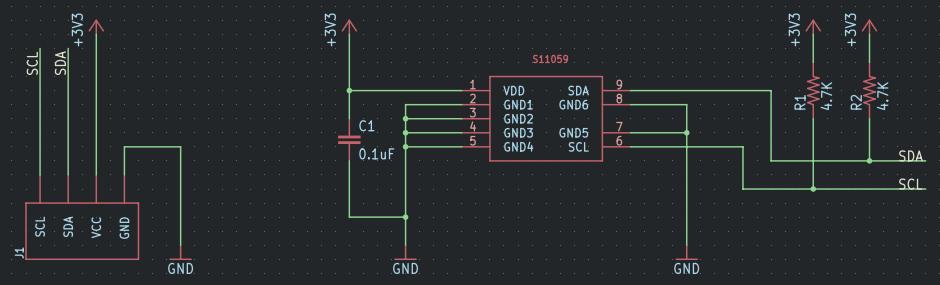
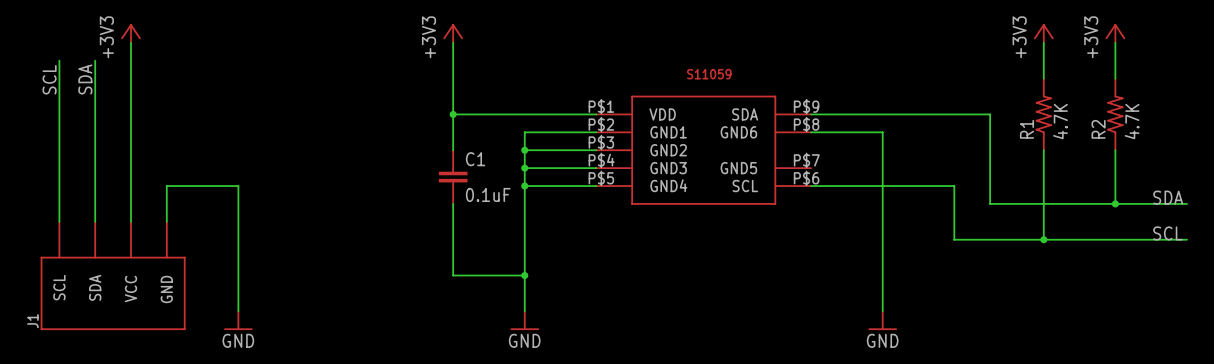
part symbol: [461, 75, 631, 162] -> [596, 95, 812, 205]
wire: (630, 132) (686, 132) -> none
junction: (686, 132) -> none

